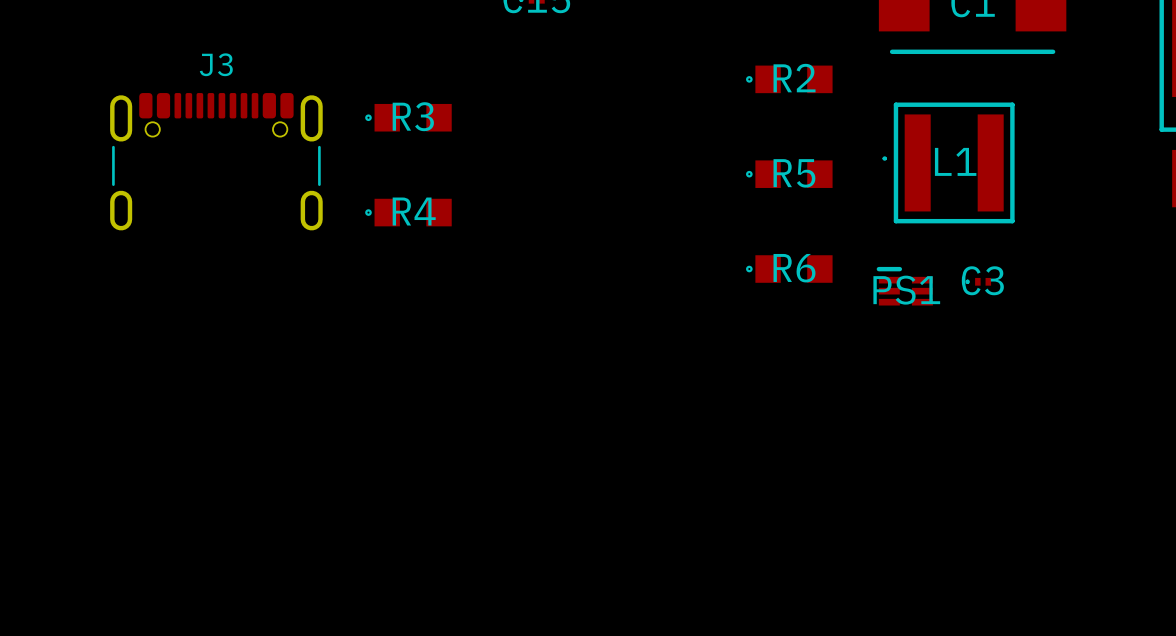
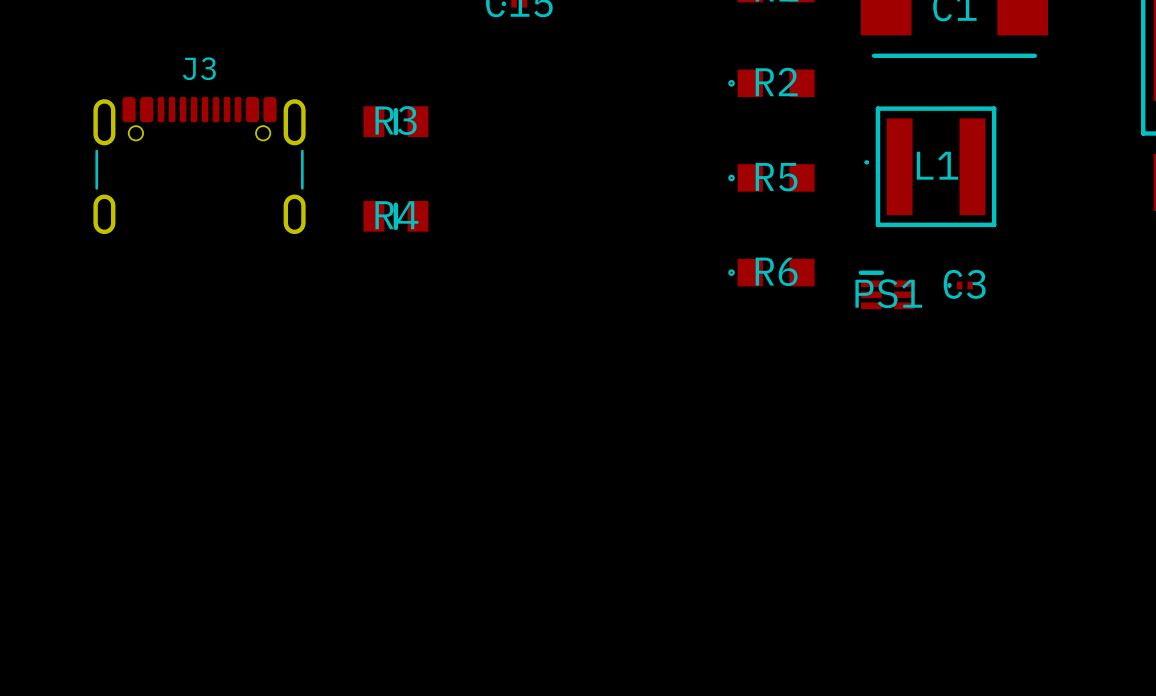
R3 footprint: [365, 103, 452, 132] -> [363, 106, 429, 138]
R4 footprint: [365, 198, 452, 227] -> [363, 200, 429, 232]

